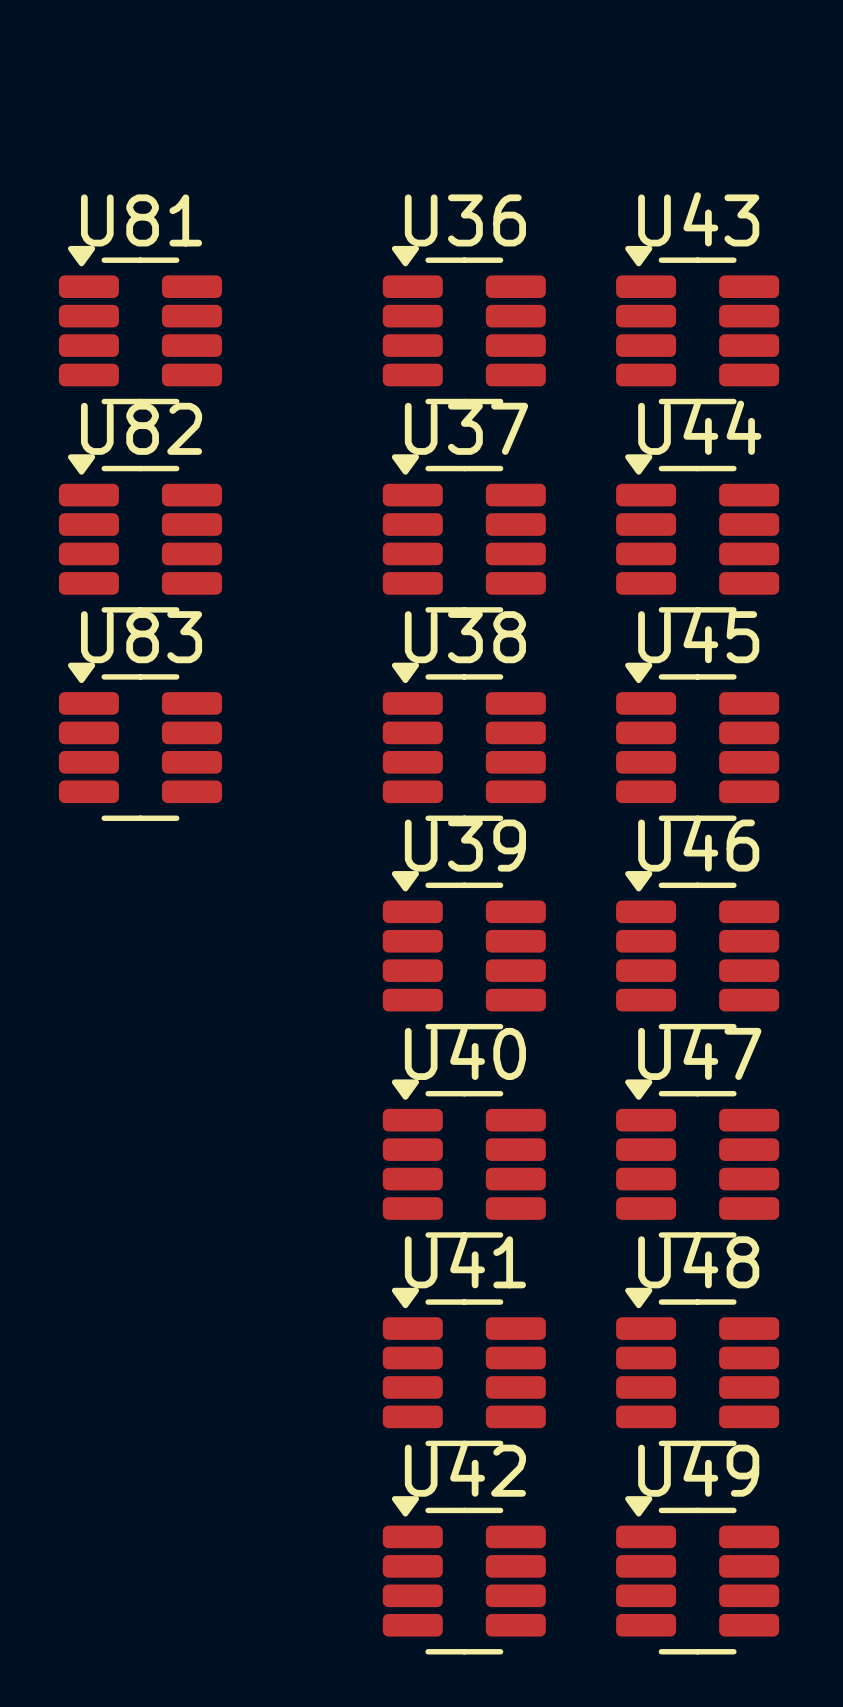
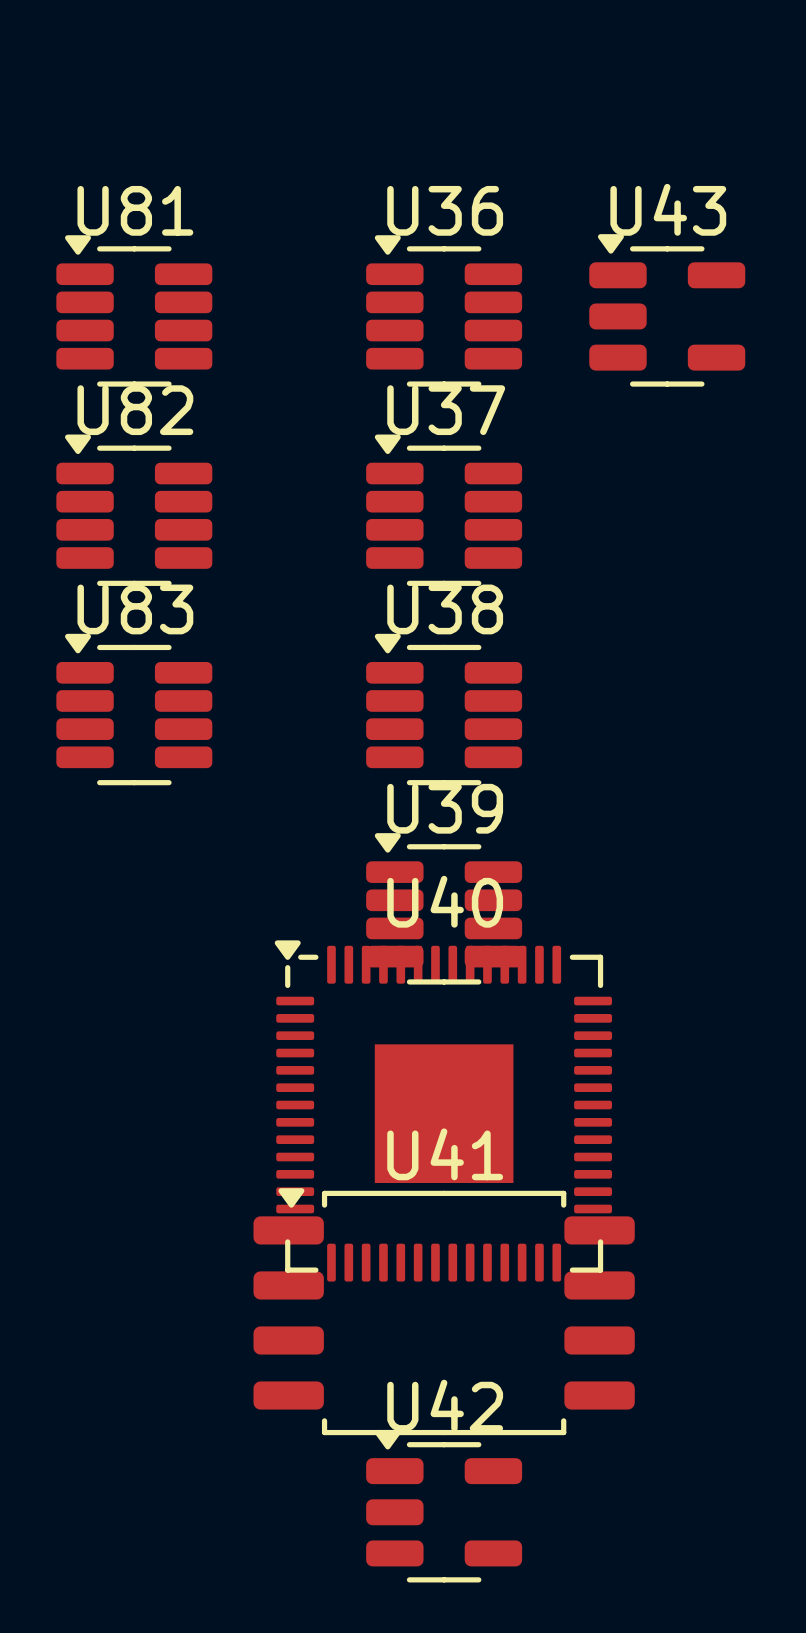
U43 footprint: [616, 245, 780, 405] -> [589, 234, 746, 387]
U44: (697, 533) -> none
U45: (697, 741) -> none
U46: (697, 950) -> none
U40 name position: U40 (465, 1052) -> U40 (445, 901)
U40 footprint: [382, 1079, 546, 1238] -> [274, 940, 613, 1282]
U47: (697, 1158) -> none
U41 footprint: [382, 1287, 546, 1447] -> [253, 1188, 635, 1436]
U48: (697, 1366) -> none
U42 footprint: [382, 1496, 546, 1655] -> [366, 1429, 523, 1583]
U49: (697, 1575) -> none

